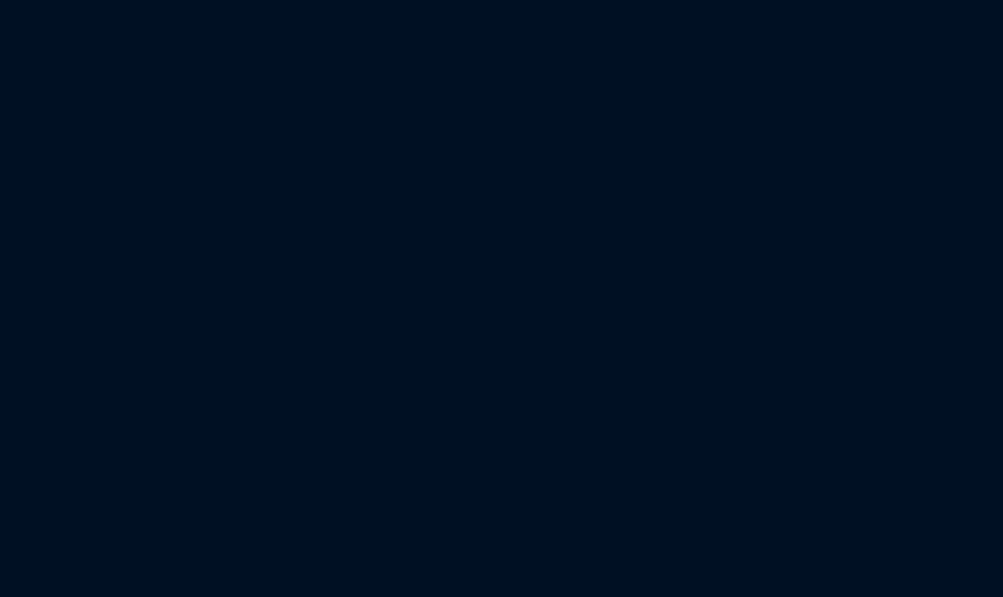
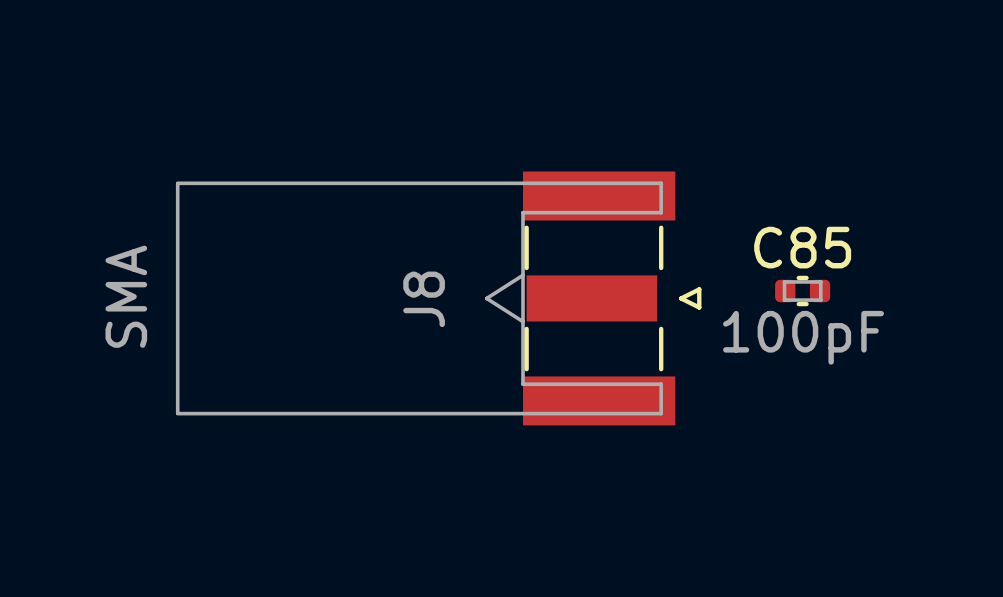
C85: none -> 100pF (802, 291)
J8: none -> SMA (438, 298)

